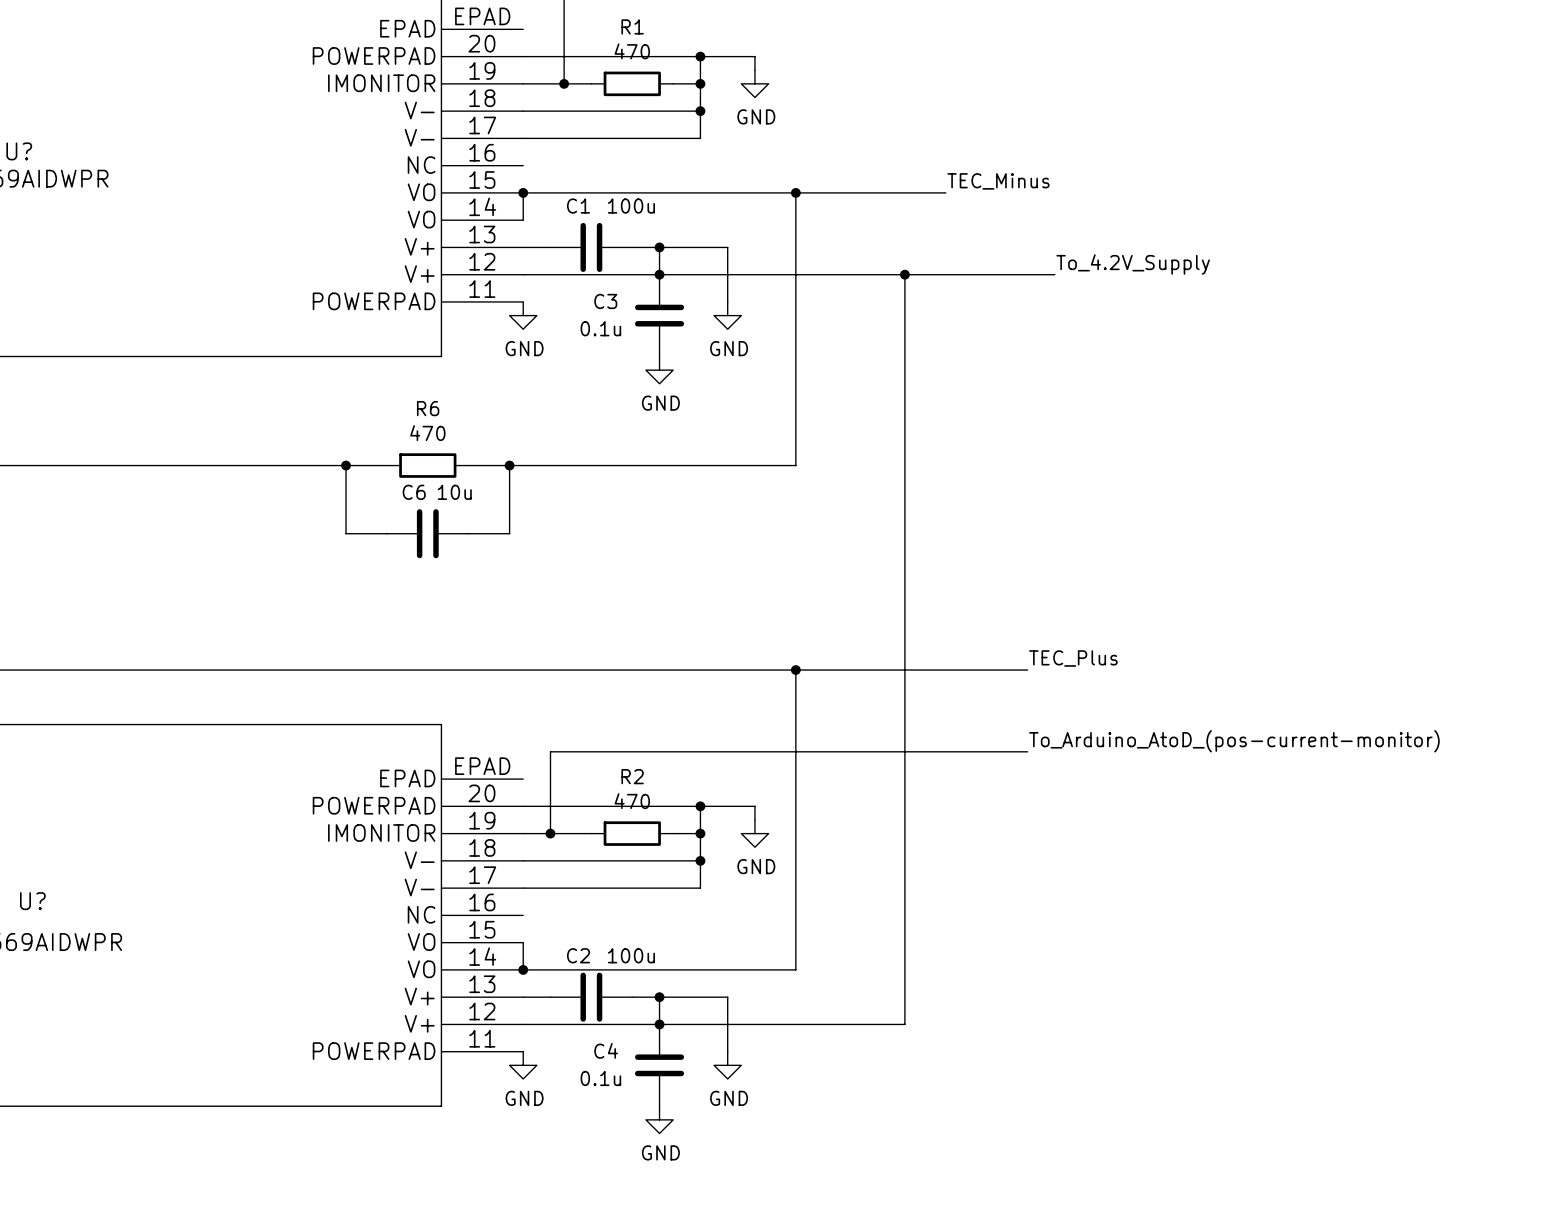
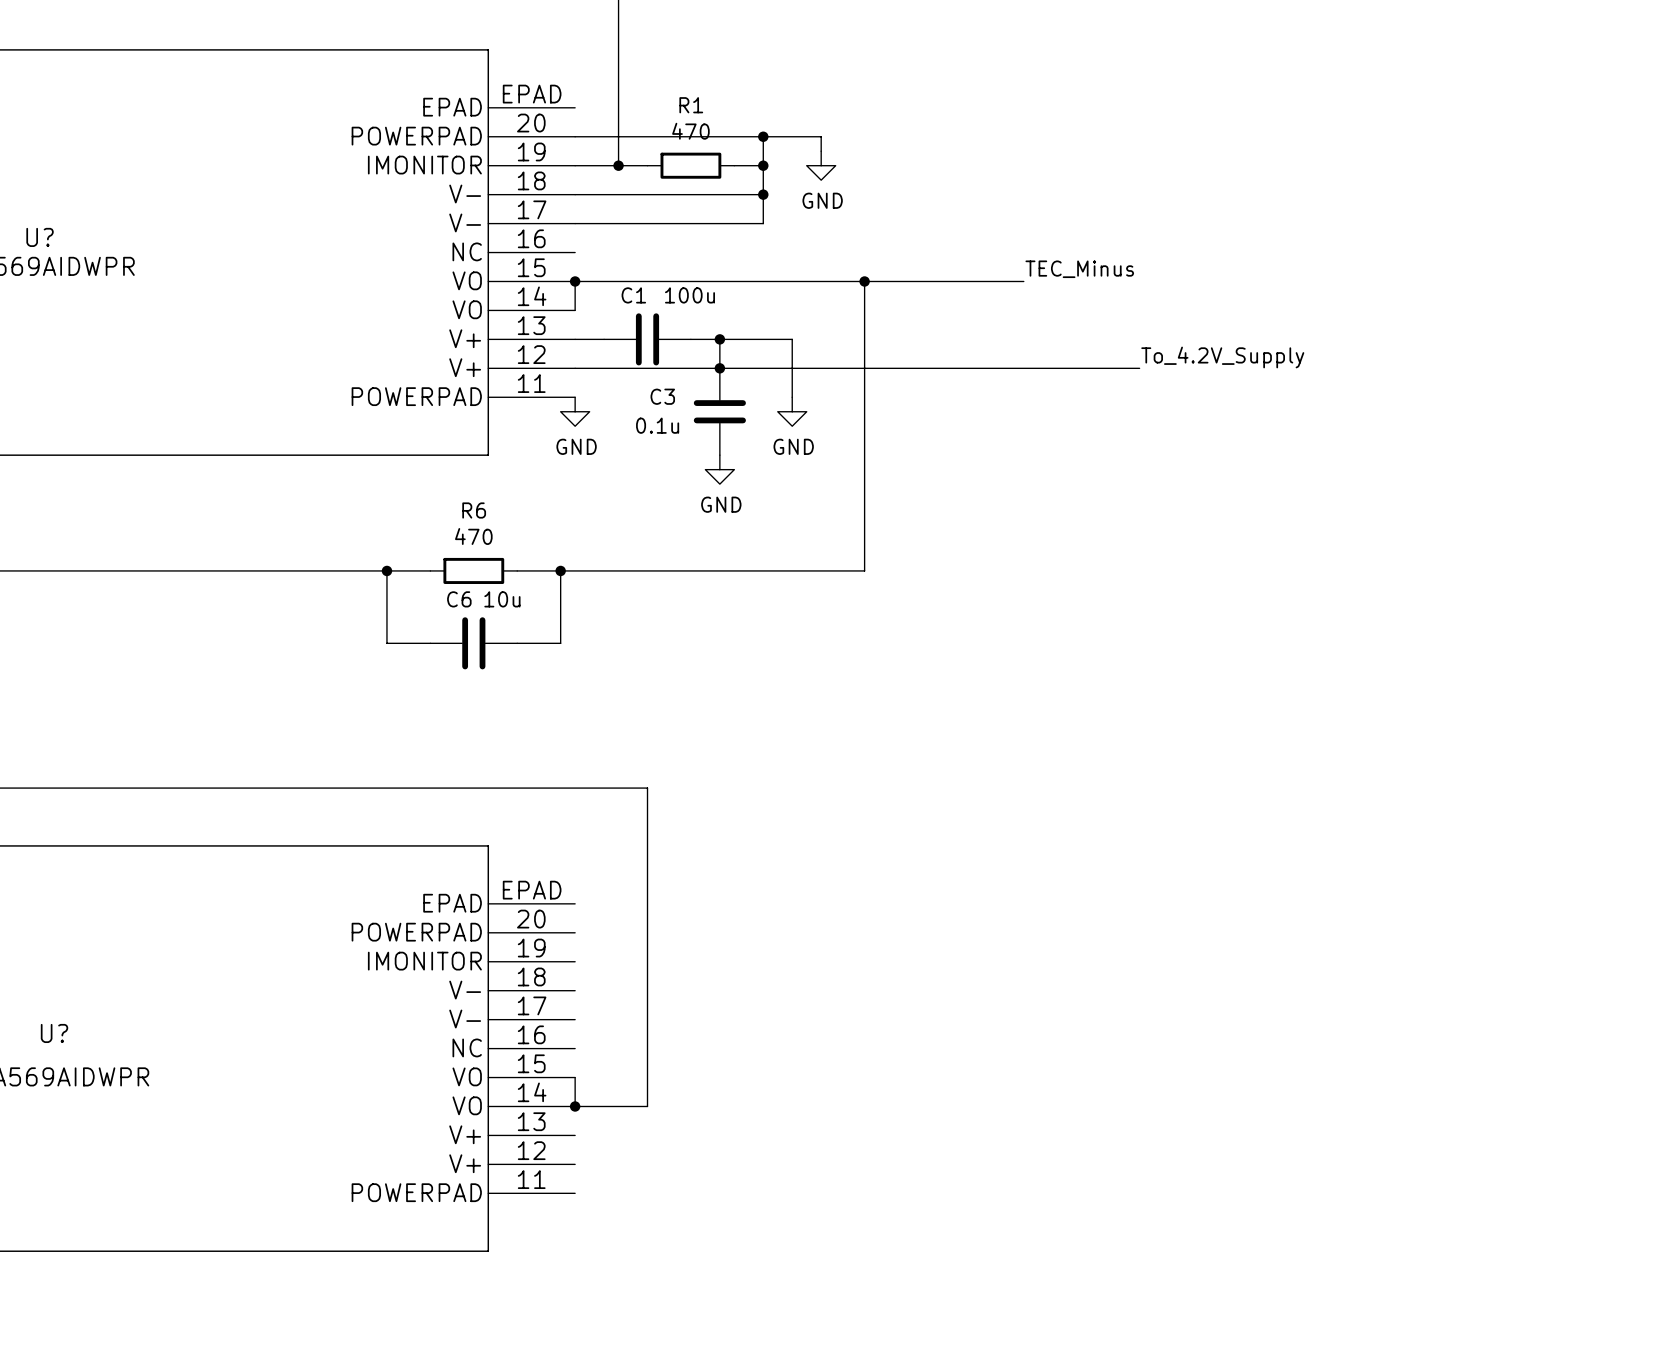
wire: (904, 274) (904, 1024) (523, 1024) -> none
junction: (904, 274) -> none
label: TEC_Plus (1073, 658) -> none
wire: (591, 670) (1027, 670) -> none
wire: (795, 670) (795, 969) (591, 969) -> (647, 788) (647, 1106)
junction: (795, 670) -> none
label: To_Arduino_AtoD_(pos-current-monitor) (1234, 741) -> none
wire: (1027, 751) (550, 751) (550, 833) -> none
wire: (523, 806) (754, 806) (754, 819) -> none
wire: (700, 806) (700, 888) (523, 888) -> none
junction: (700, 806) -> none
wire: (523, 833) (591, 833) -> none
junction: (550, 833) -> none
R2: 470 (632, 833) -> none
wire: (673, 833) (700, 833) -> none
junction: (700, 833) -> none
power symbol: GND (754, 833) -> none
wire: (523, 860) (700, 860) -> none
junction: (700, 860) -> none
wire: (523, 997) (550, 997) -> none
C2: 100u (591, 997) -> none
wire: (632, 997) (727, 997) (727, 1051) -> none
wire: (659, 997) (659, 1024) -> none
junction: (659, 997) -> none
junction: (659, 1024) -> none
power symbol: GND (523, 1065) -> none
C4: 0.1u (659, 1065) -> none
power symbol: GND (727, 1065) -> none
power symbol: GND (659, 1119) -> none

